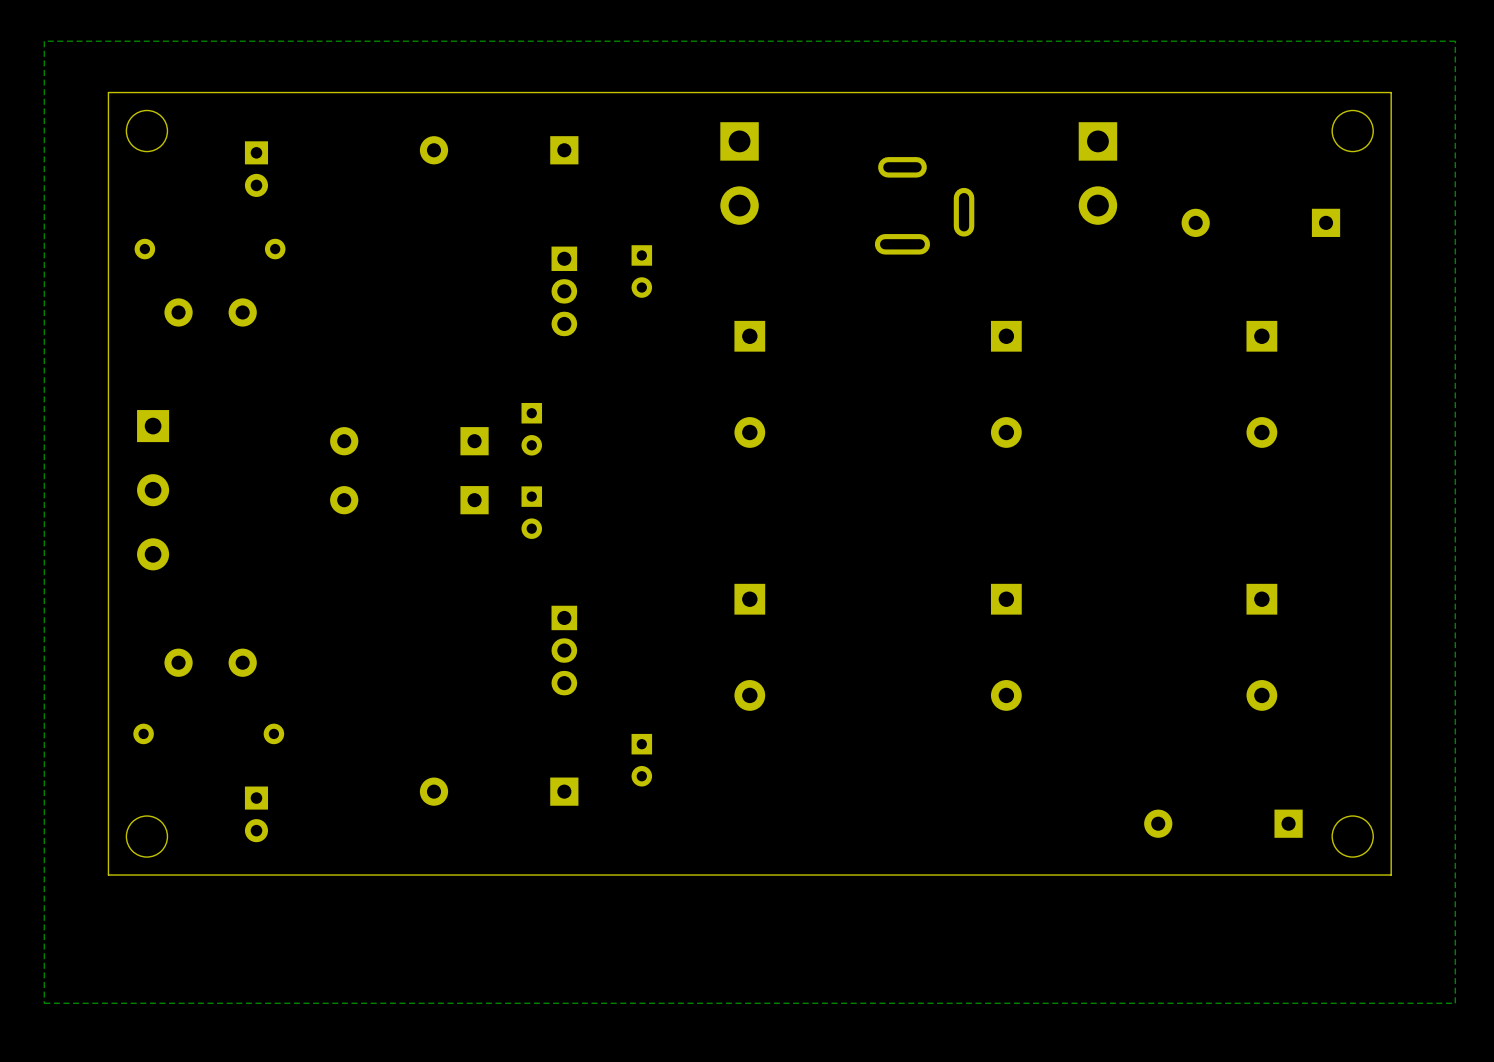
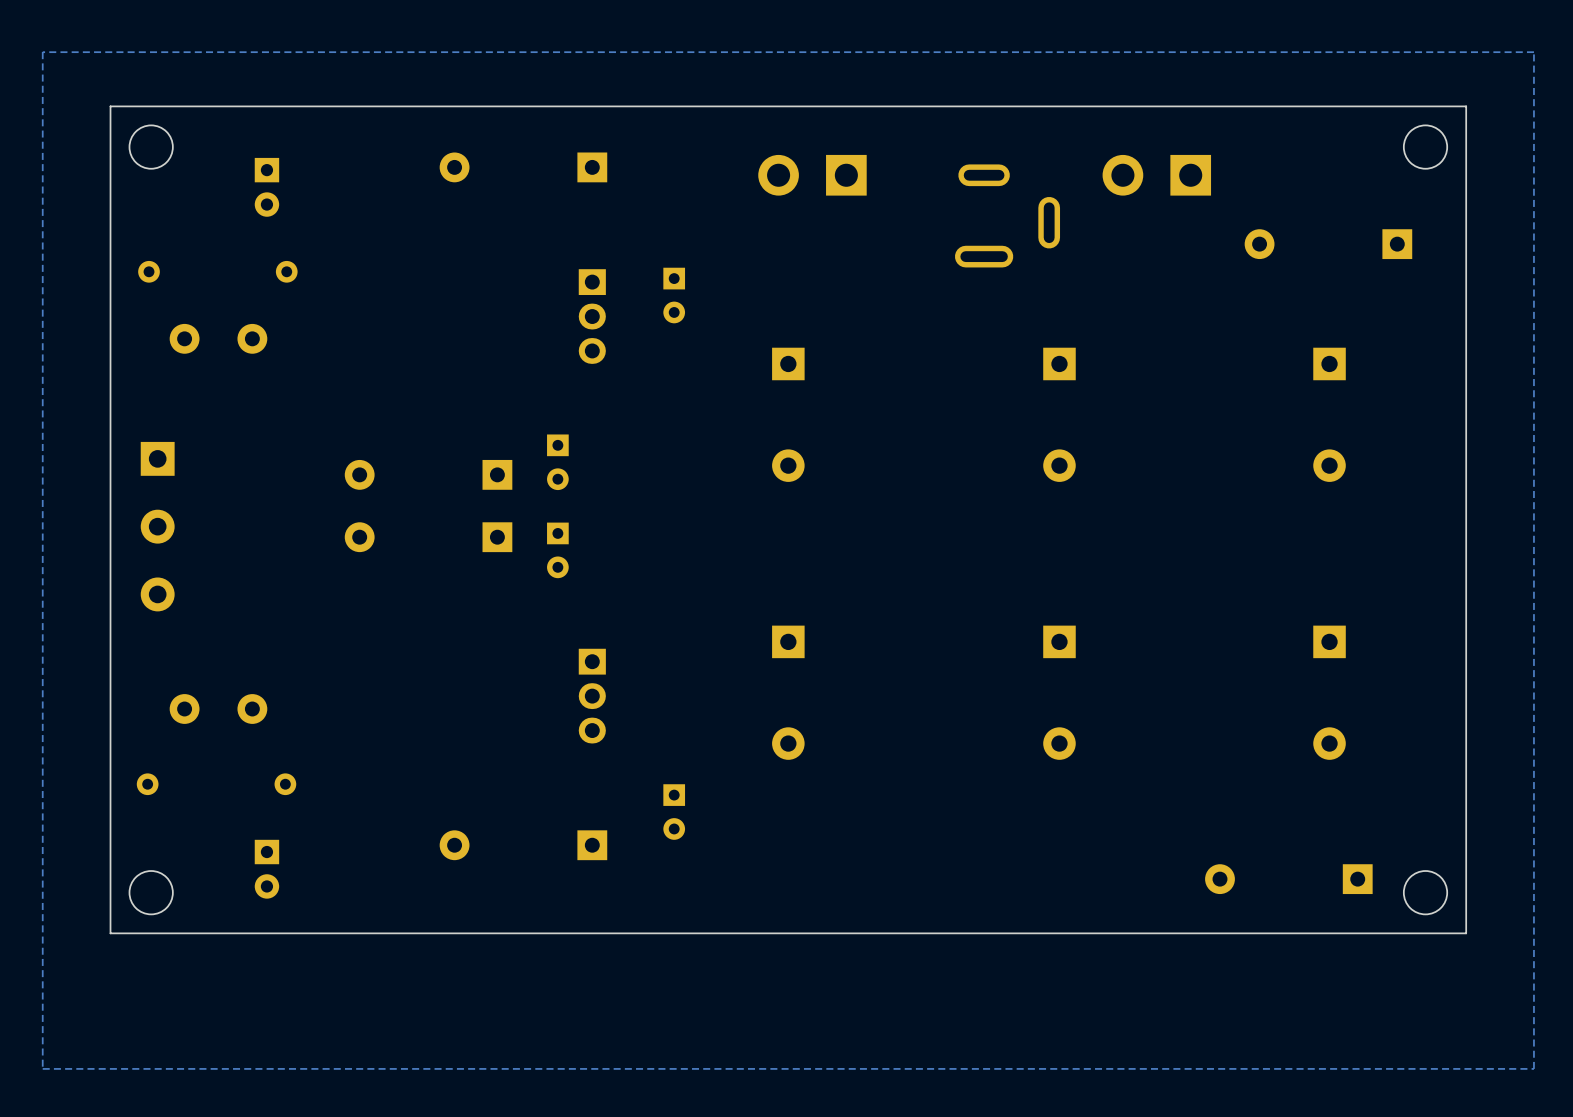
part rotation: 0° (739, 173) -> 90° clockwise (812, 175)
part rotation: 0° (1097, 173) -> 90° clockwise (1156, 175)
part position: (924, 205) -> (1007, 215)

